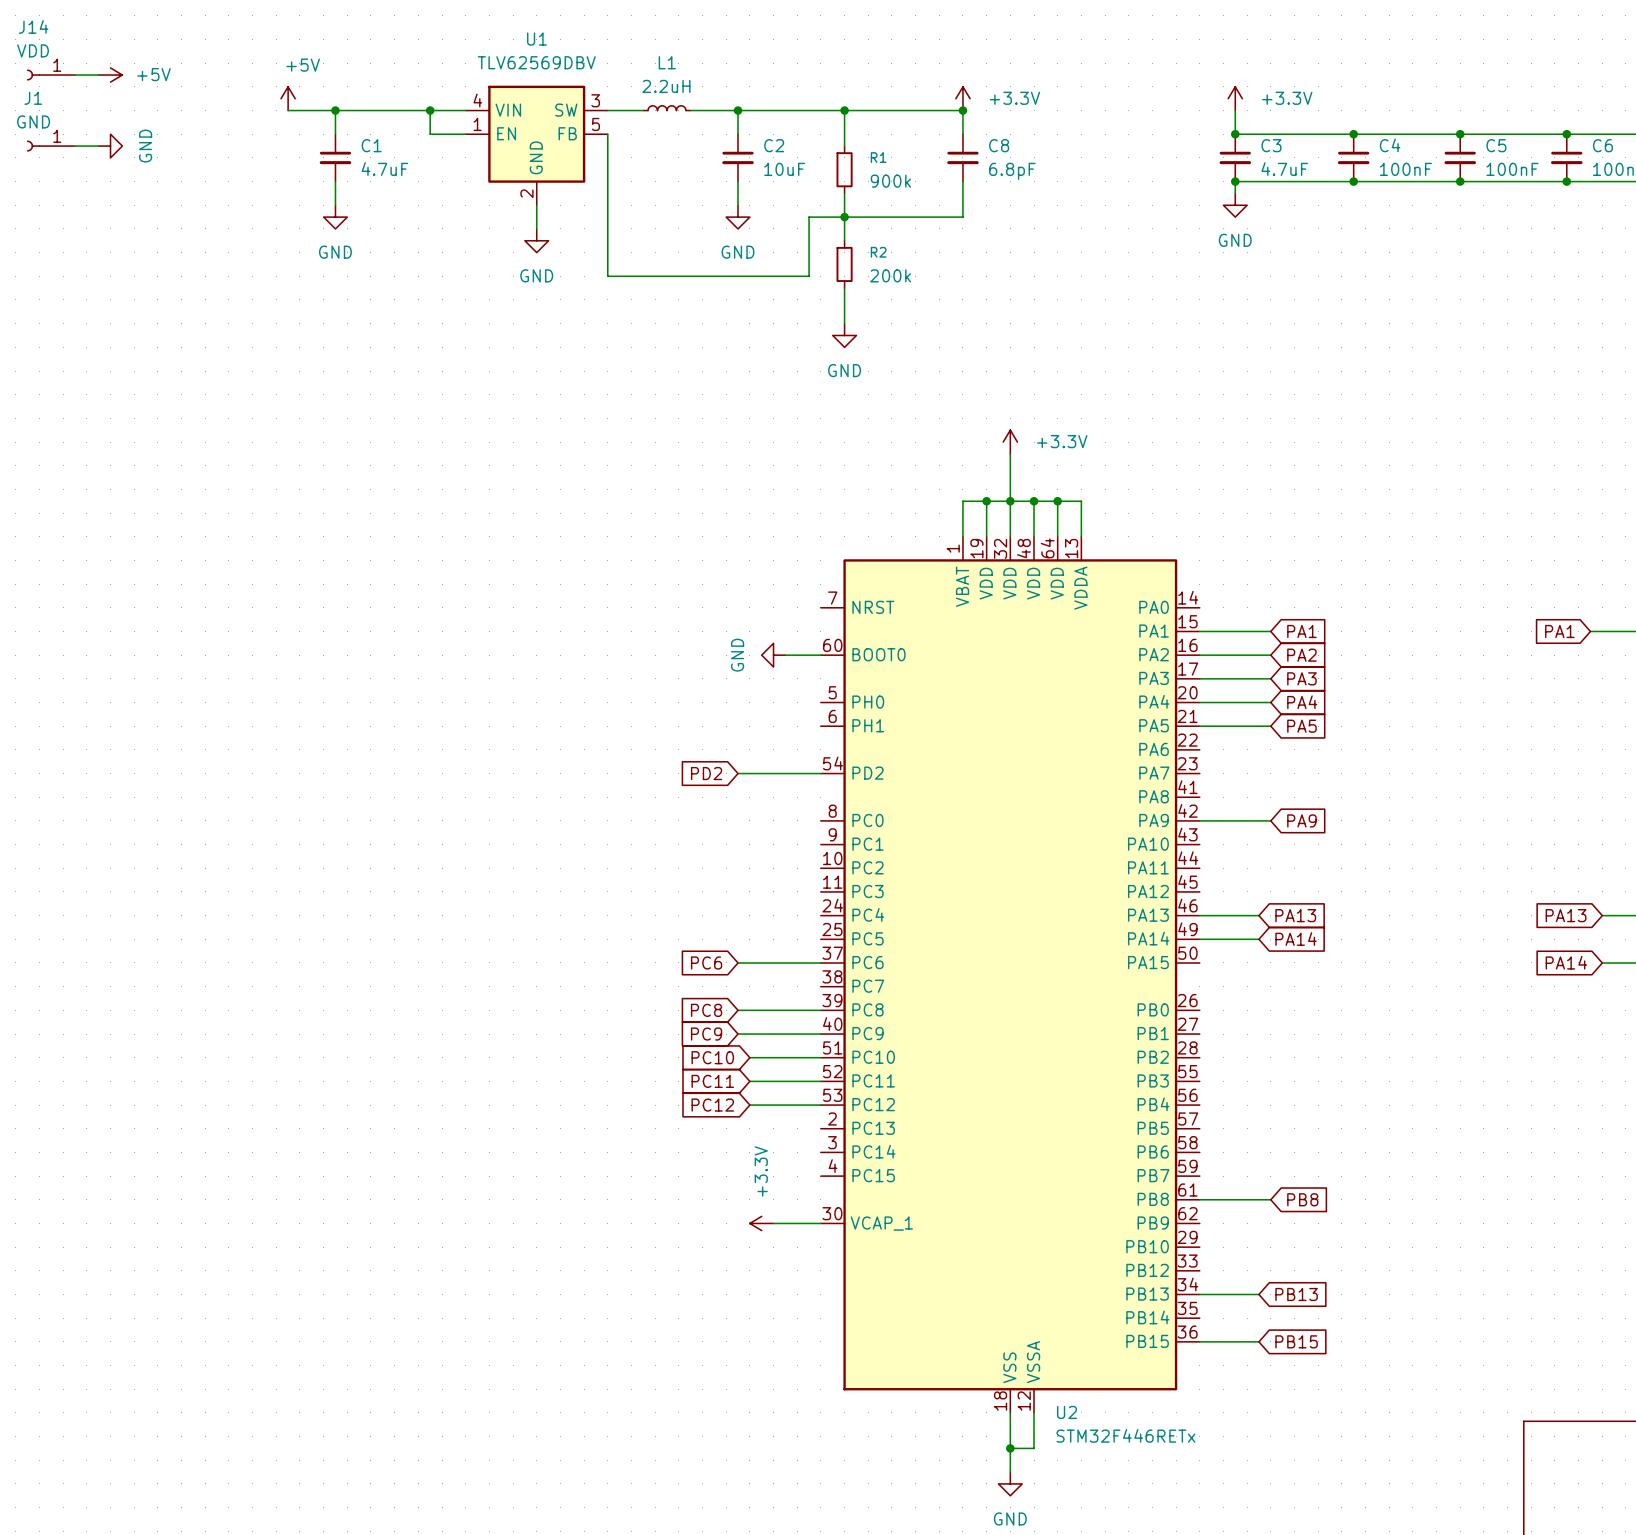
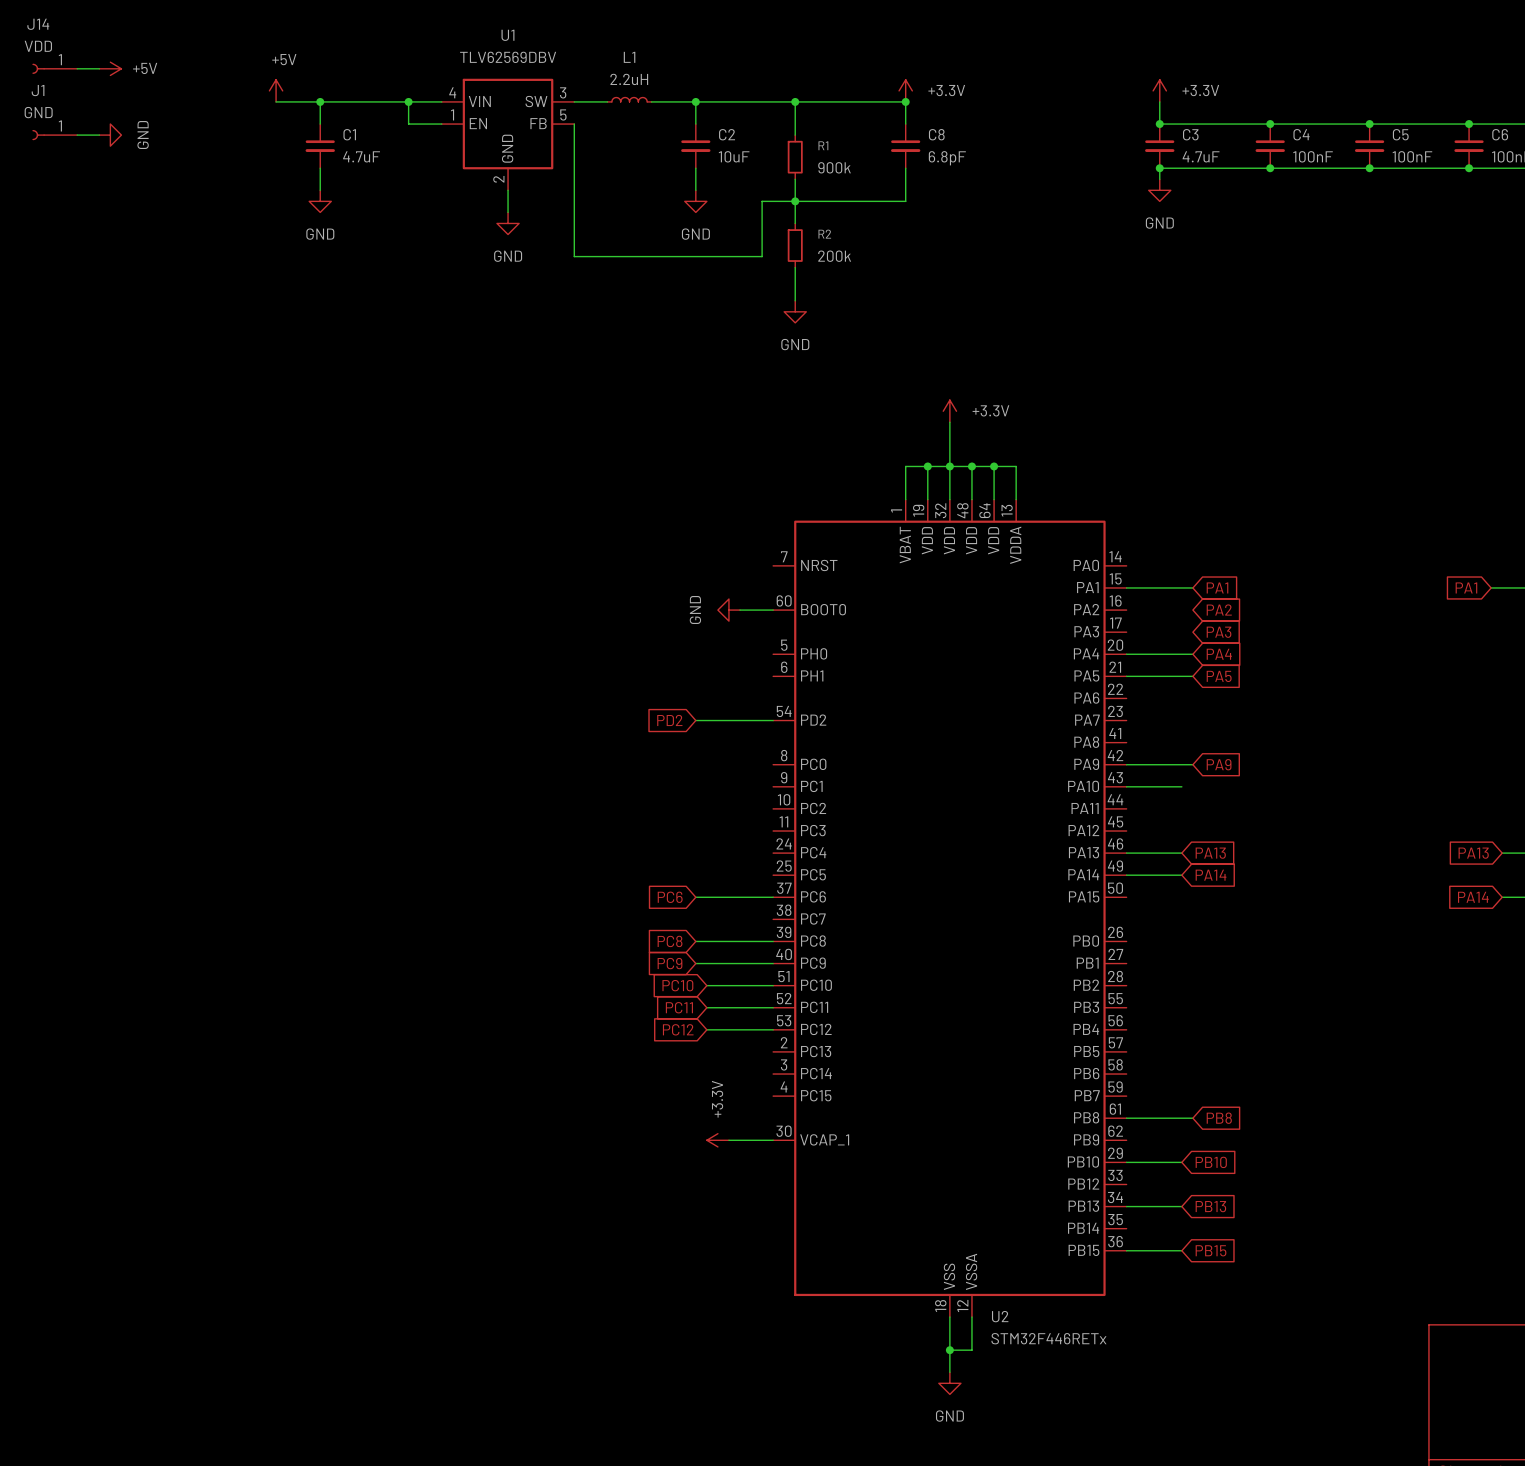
wire: (1199, 655) (1270, 655) -> none
wire: (1199, 678) (1270, 678) -> none
wire: none -> (1126, 786) (1181, 786)
wire: none -> (1126, 1162) (1181, 1162)
global label: none -> PB10 (1211, 1162)

